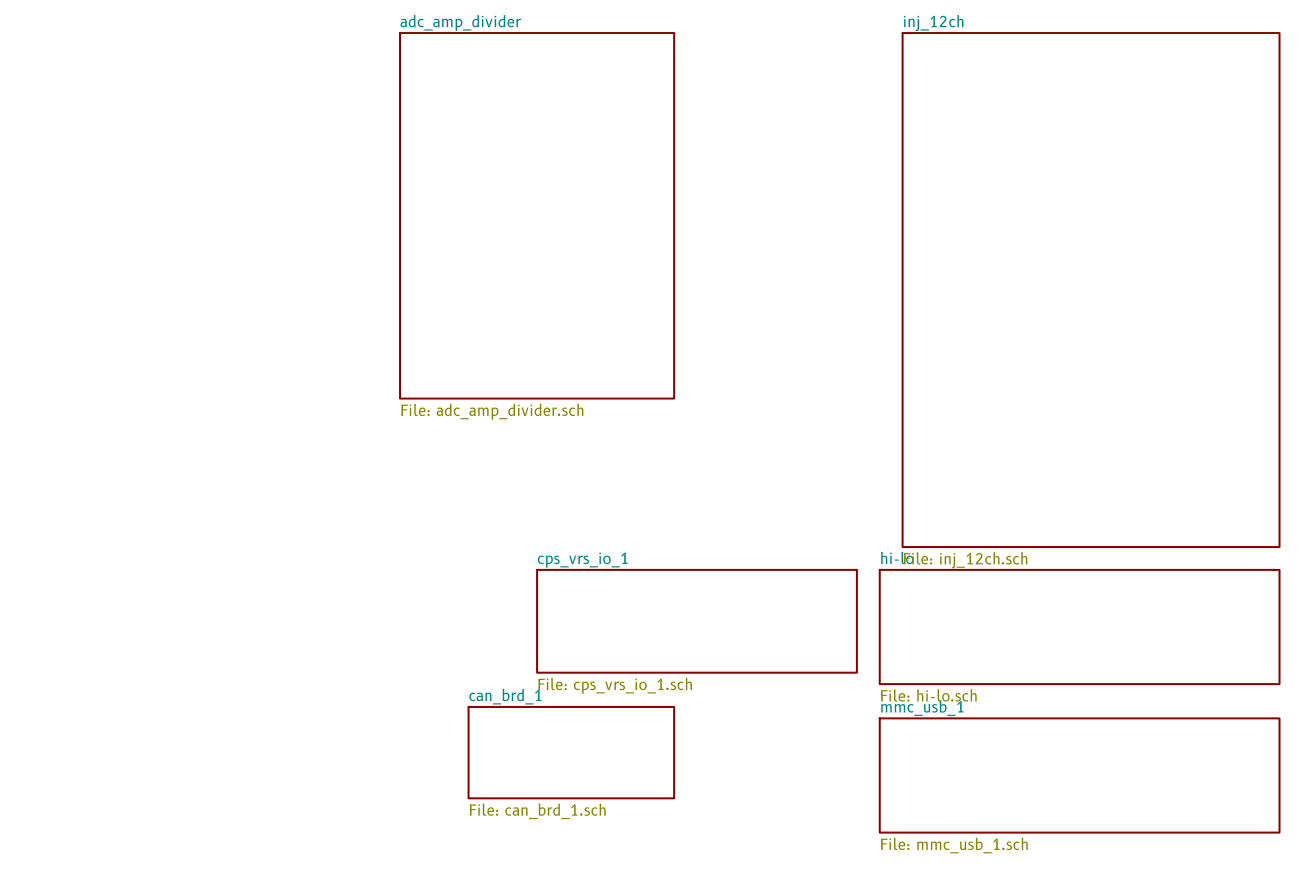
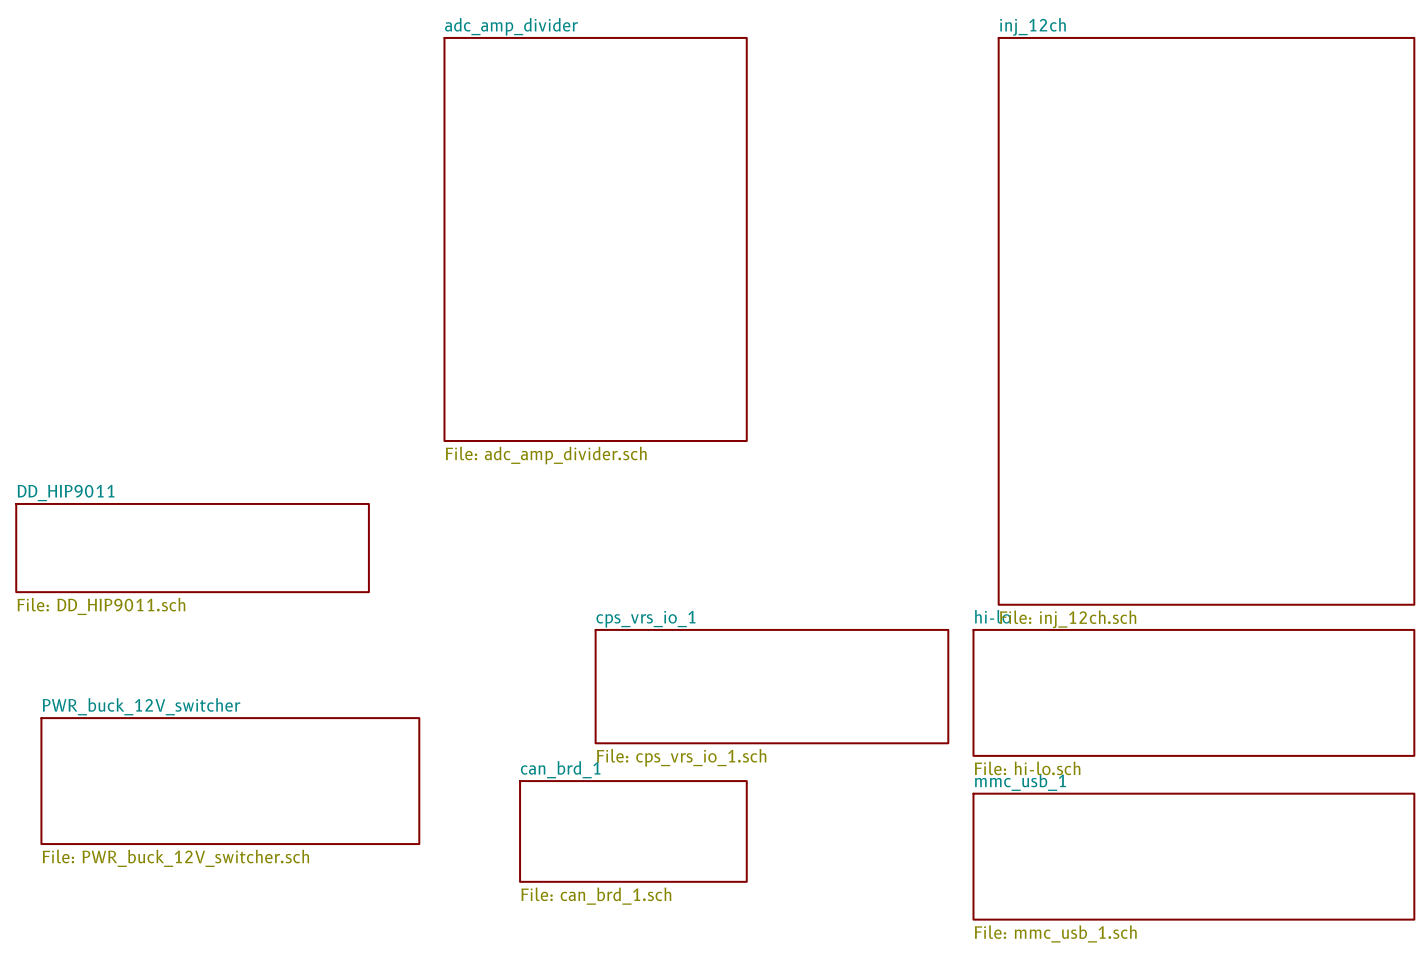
sheet DD_HIP9011: none -> File: DD_HIP9011.sch (192, 548)
sheet PWR_buck_12V_switcher: none -> File: PWR_buck_12V_switcher.sch (230, 781)

